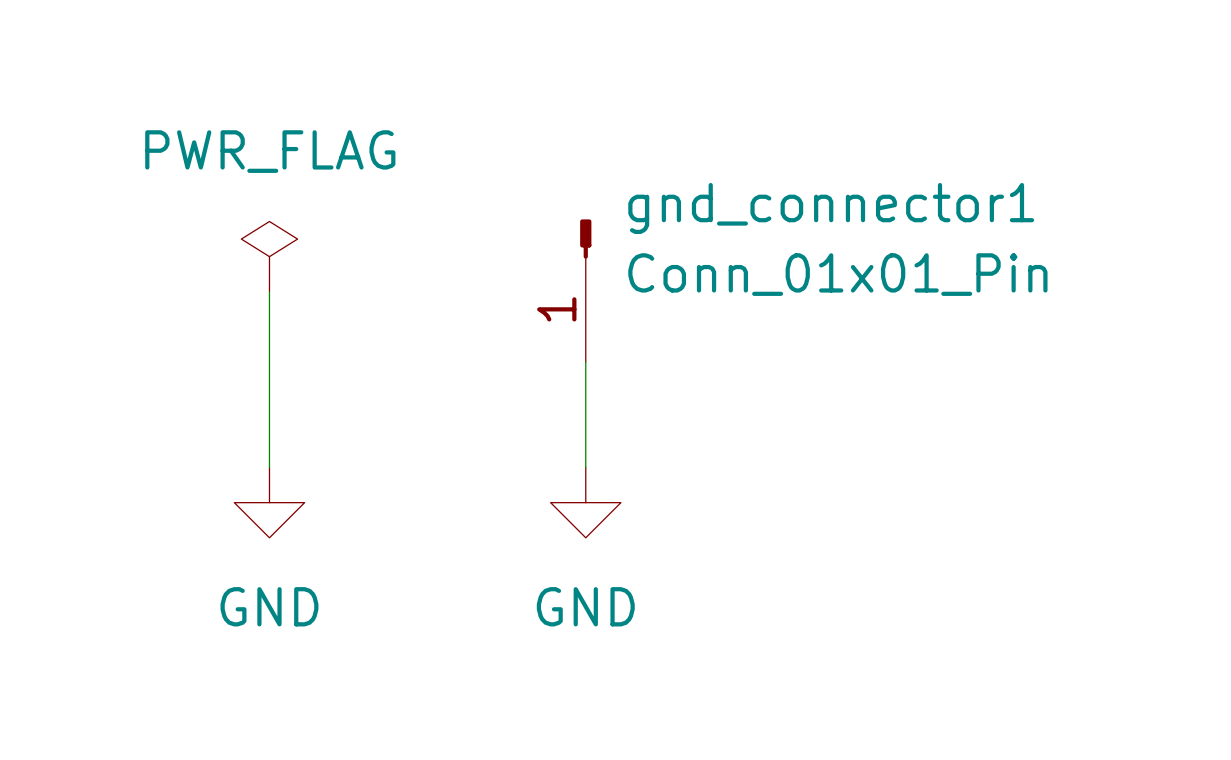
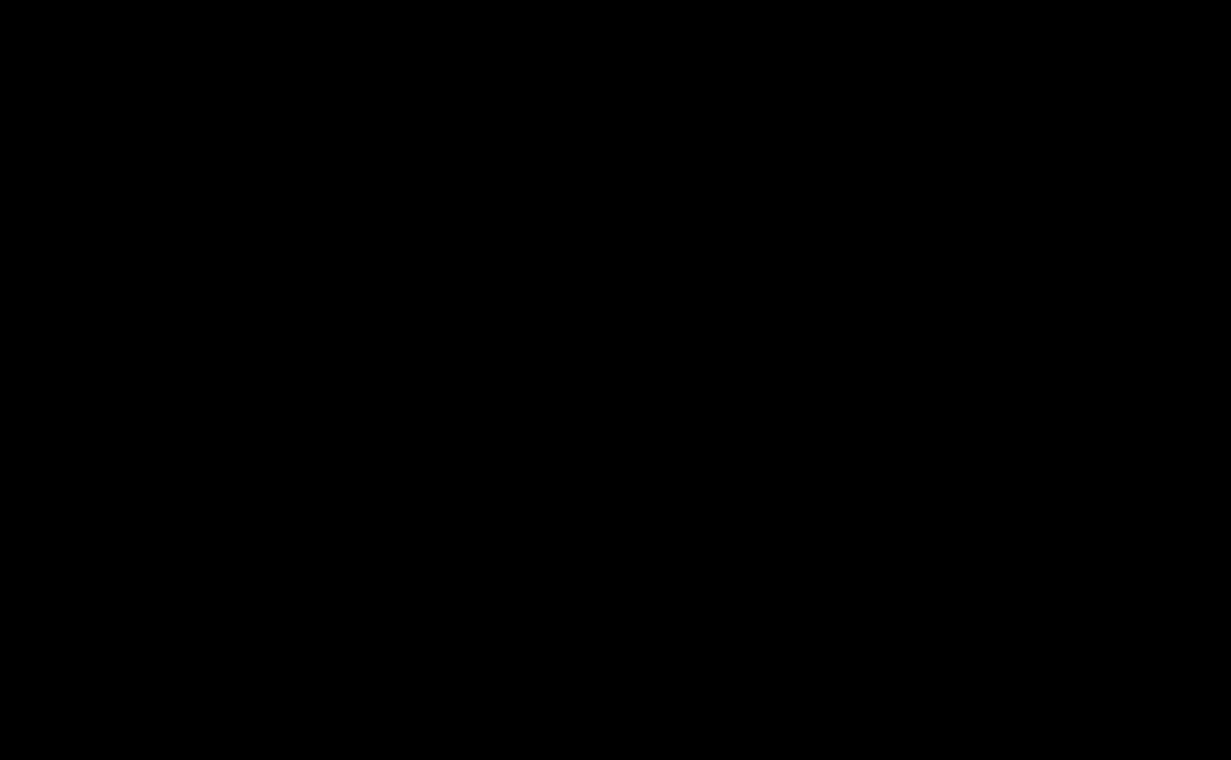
power symbol: PWR_FLAG (269, 256) -> none
gnd_connector1: Conn_01x01_Pin (585, 290) -> none
wire: (269, 291) (269, 467) -> none
wire: (585, 362) (585, 467) -> none
power symbol: GND (269, 502) -> none
power symbol: GND (585, 502) -> none

